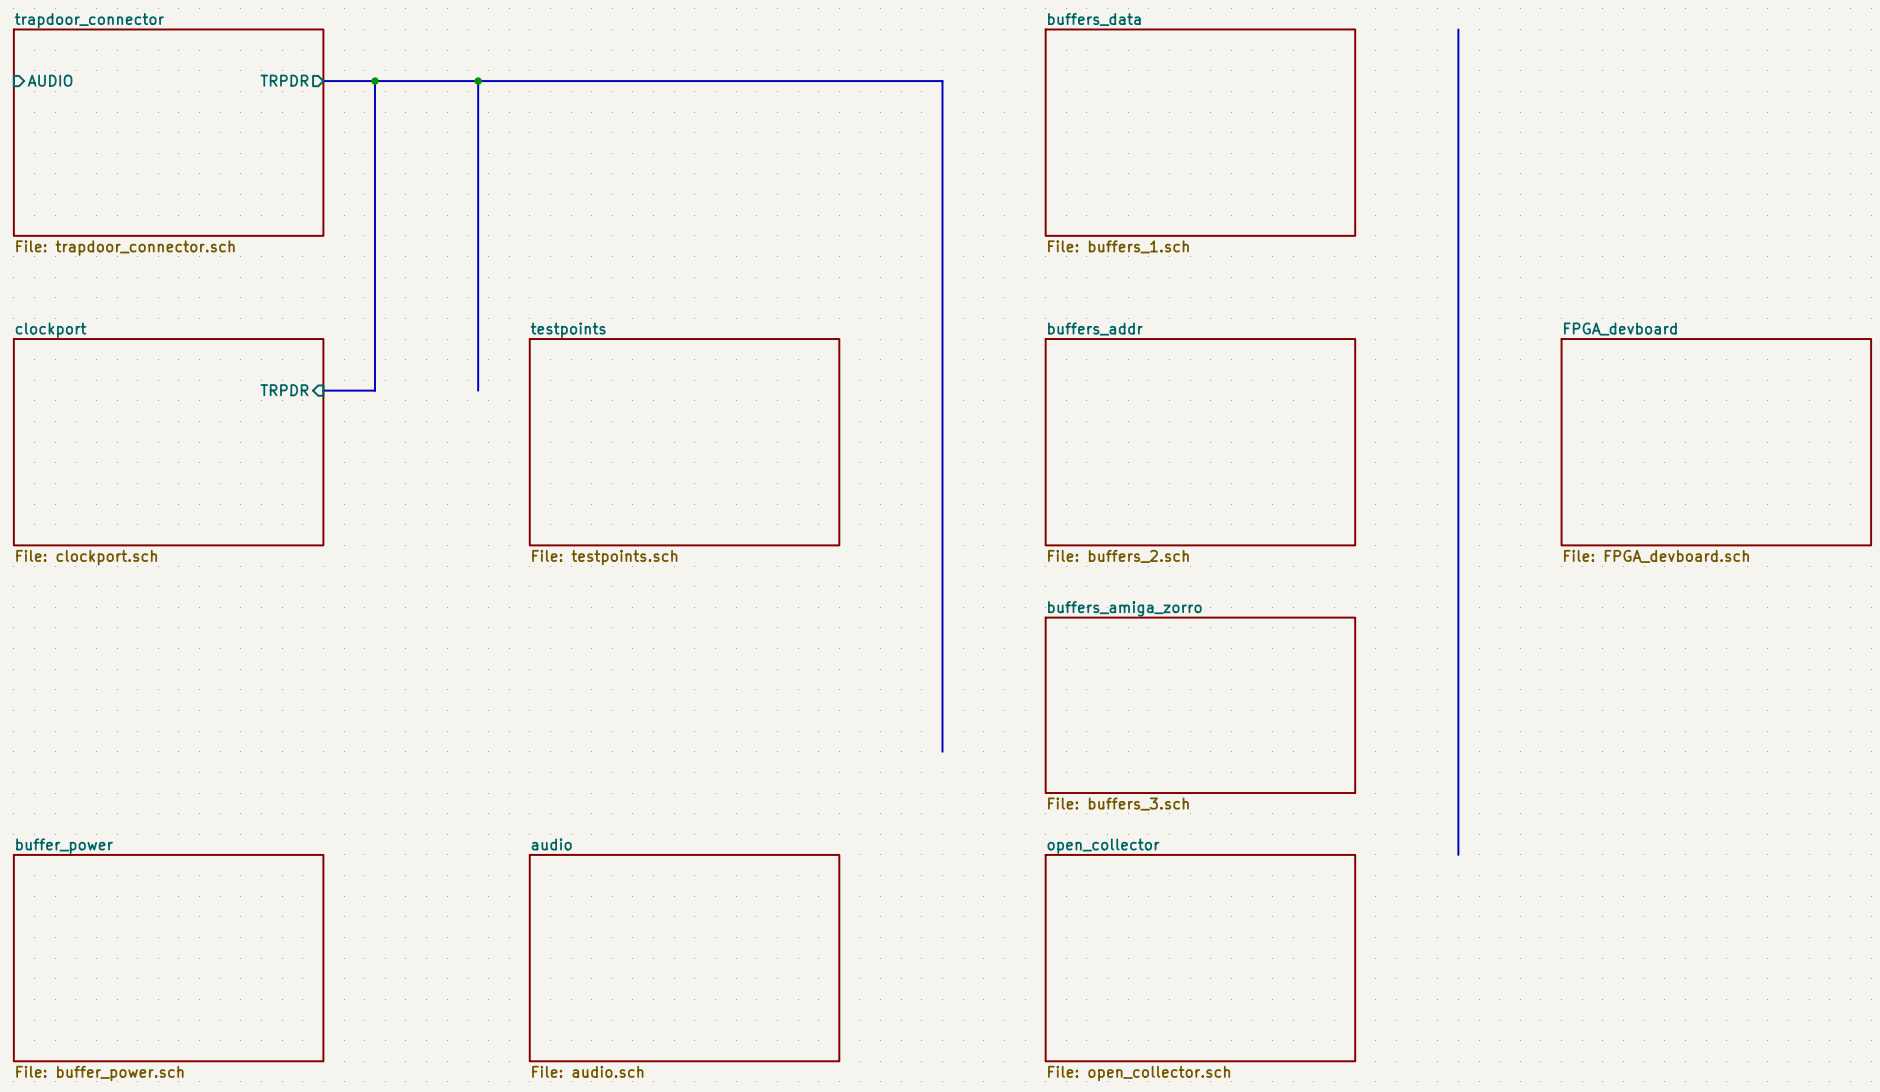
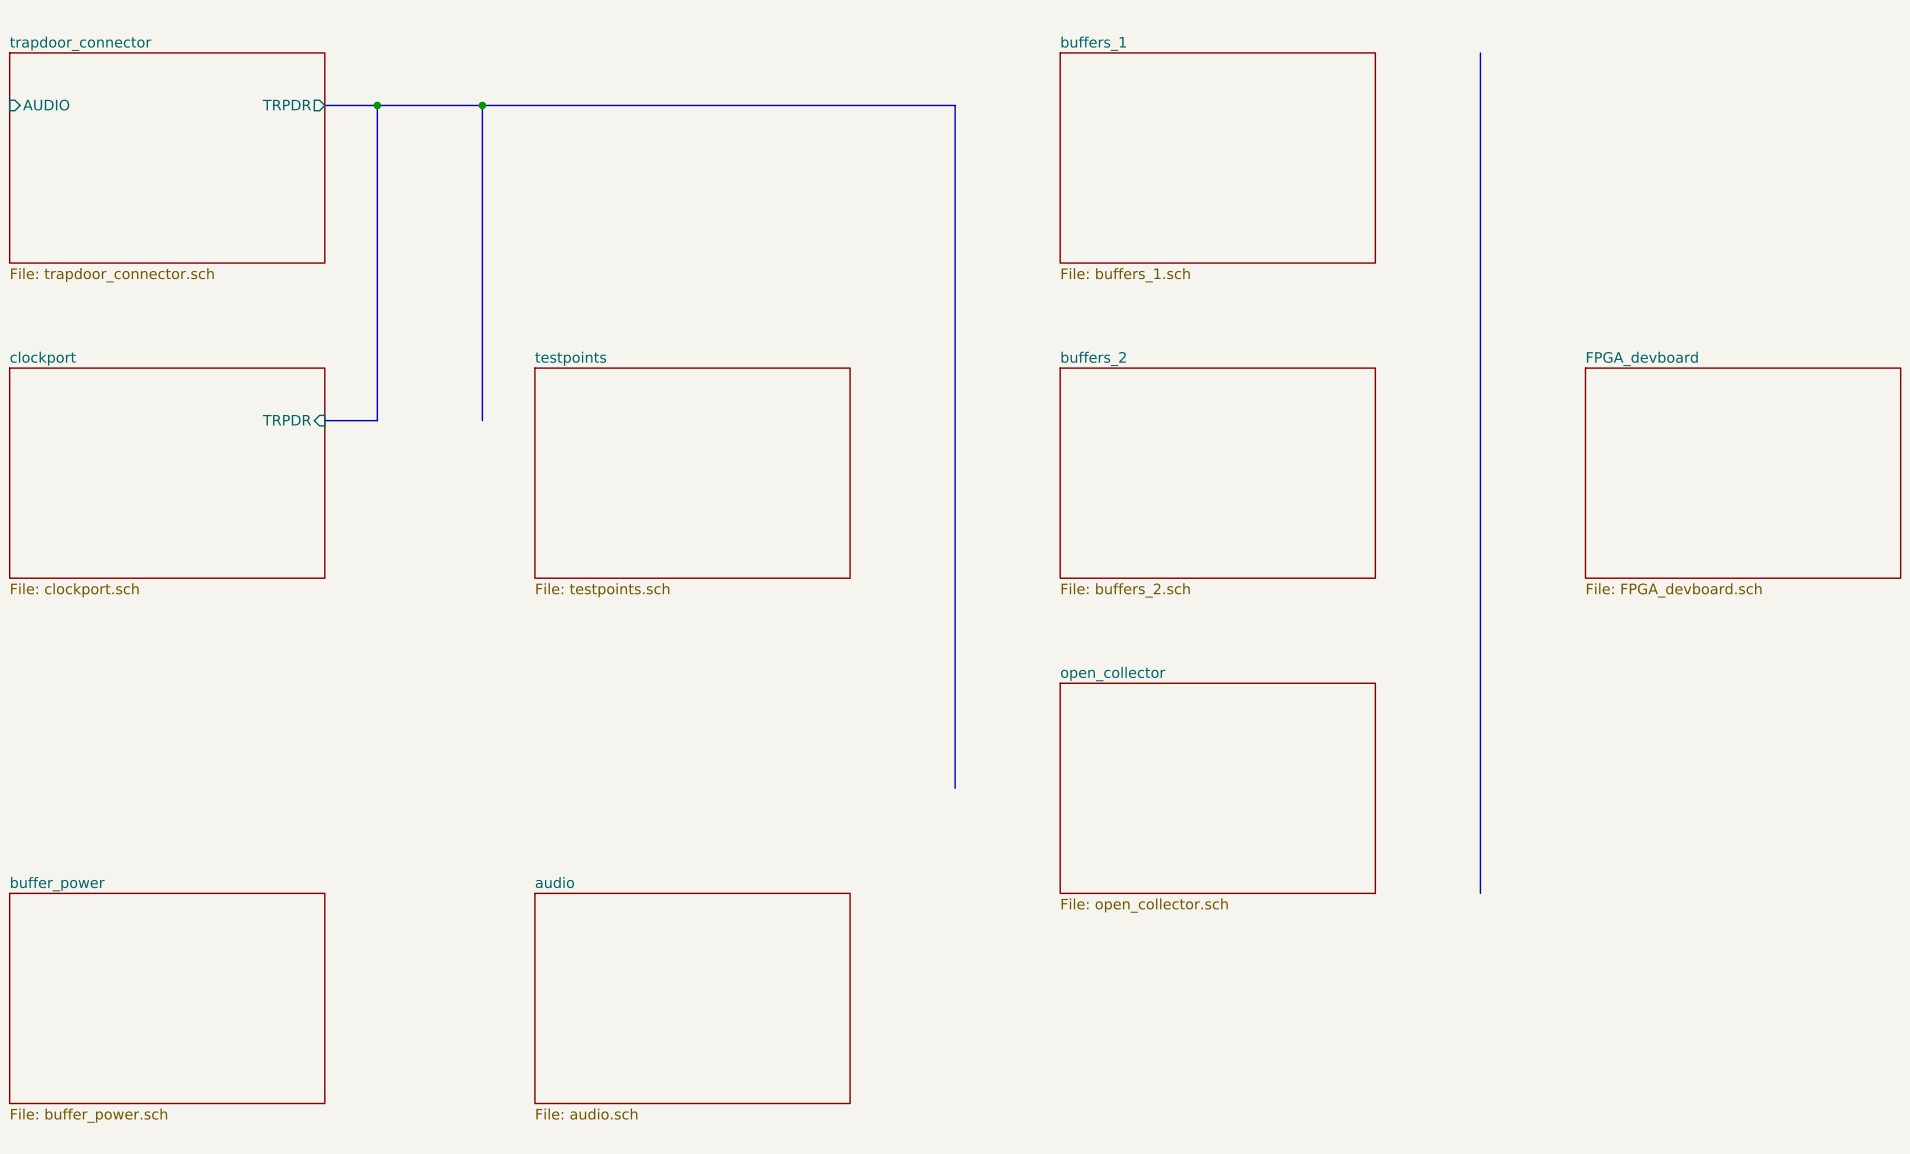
sheet buffers_data name: buffers_data (1094, 19) -> buffers_1 (1093, 43)
sheet buffers_addr name: buffers_addr (1095, 329) -> buffers_2 (1093, 358)
sheet buffers_amiga_zorro: File: buffers_3.sch (1200, 705) -> none
sheet open_collector: none -> File: open_collector.sch (1217, 788)
sheet open_collector: File: open_collector.sch (1200, 958) -> none

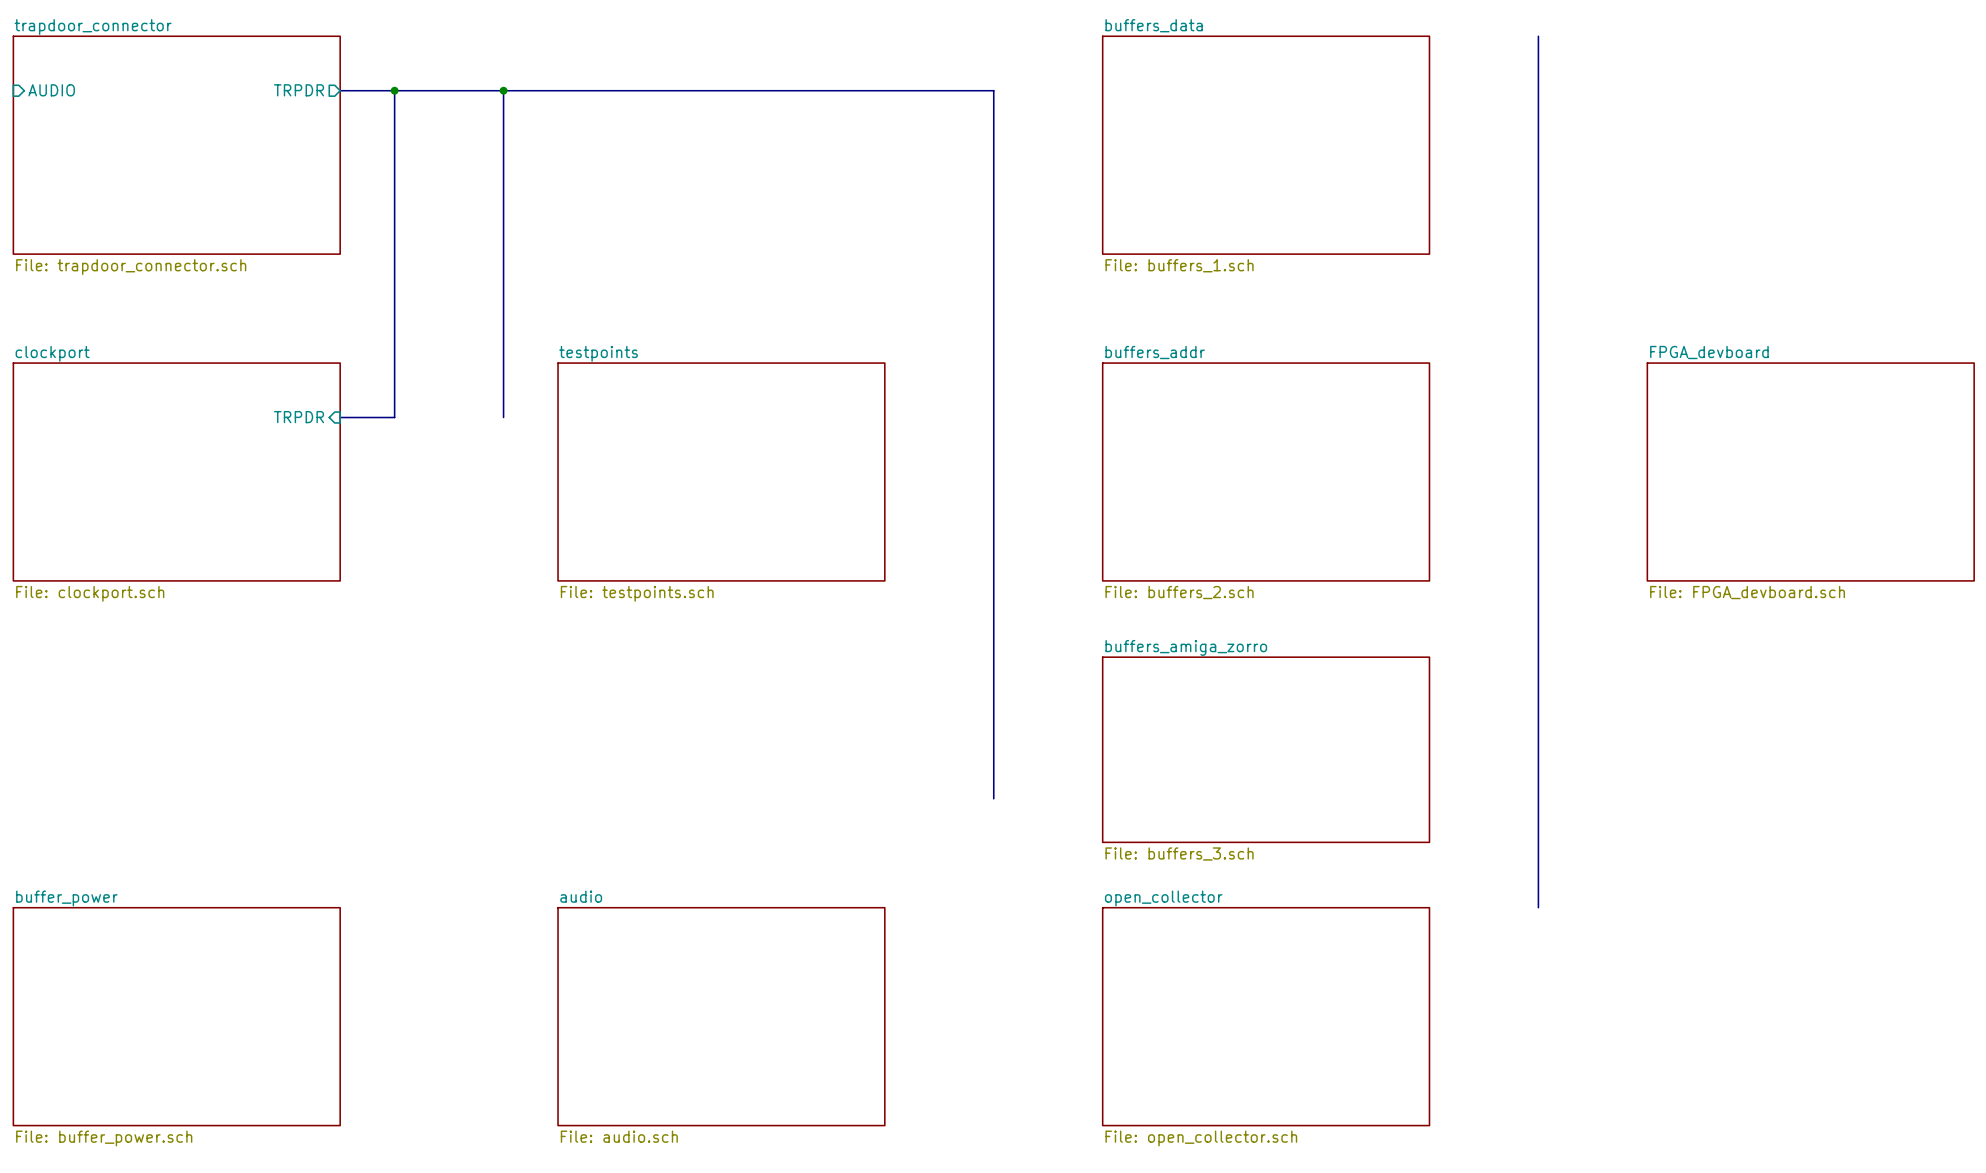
sheet buffers_1 name: buffers_1 (1093, 43) -> buffers_data (1154, 25)
sheet buffers_2 name: buffers_2 (1093, 358) -> buffers_addr (1155, 352)
sheet buffers_amiga_zorro: none -> File: buffers_3.sch (1266, 749)
sheet open_collector: File: open_collector.sch (1217, 788) -> none
sheet open_collector: none -> File: open_collector.sch (1266, 1016)

